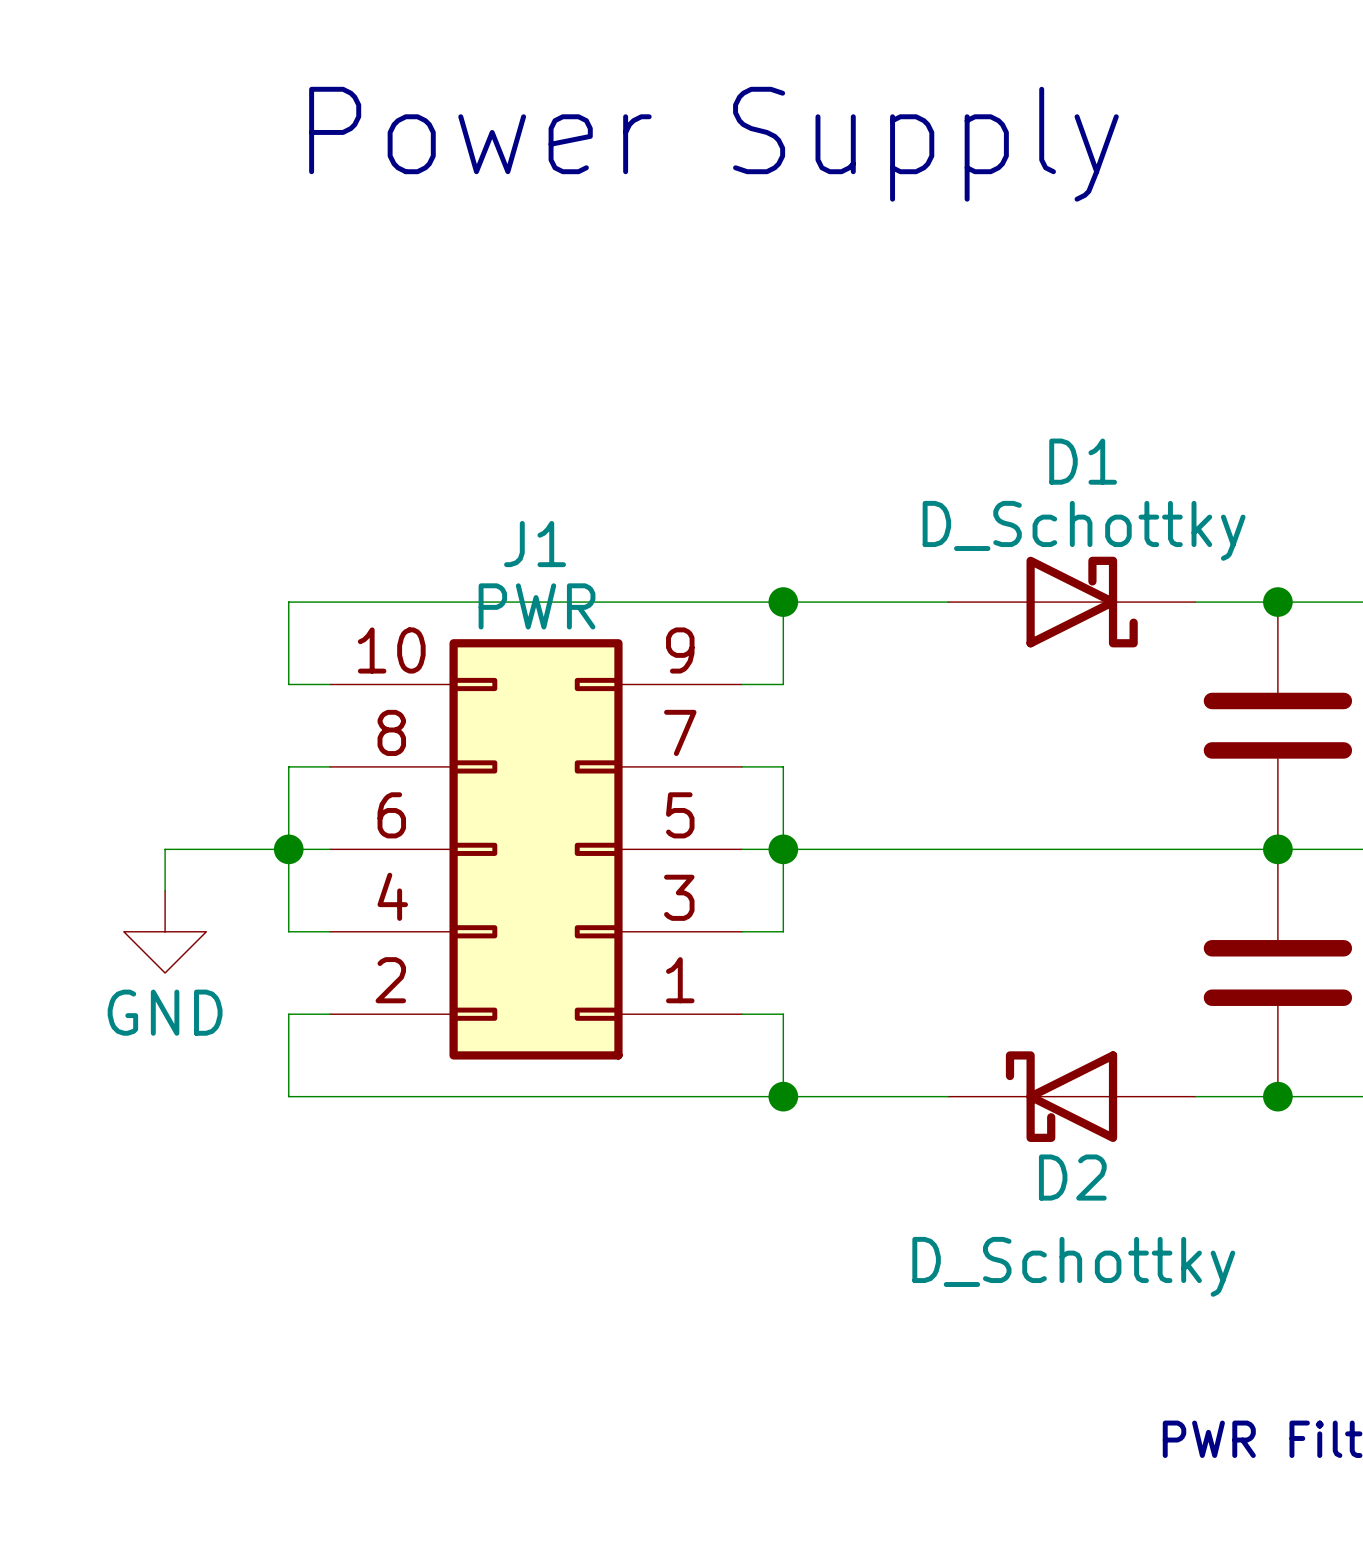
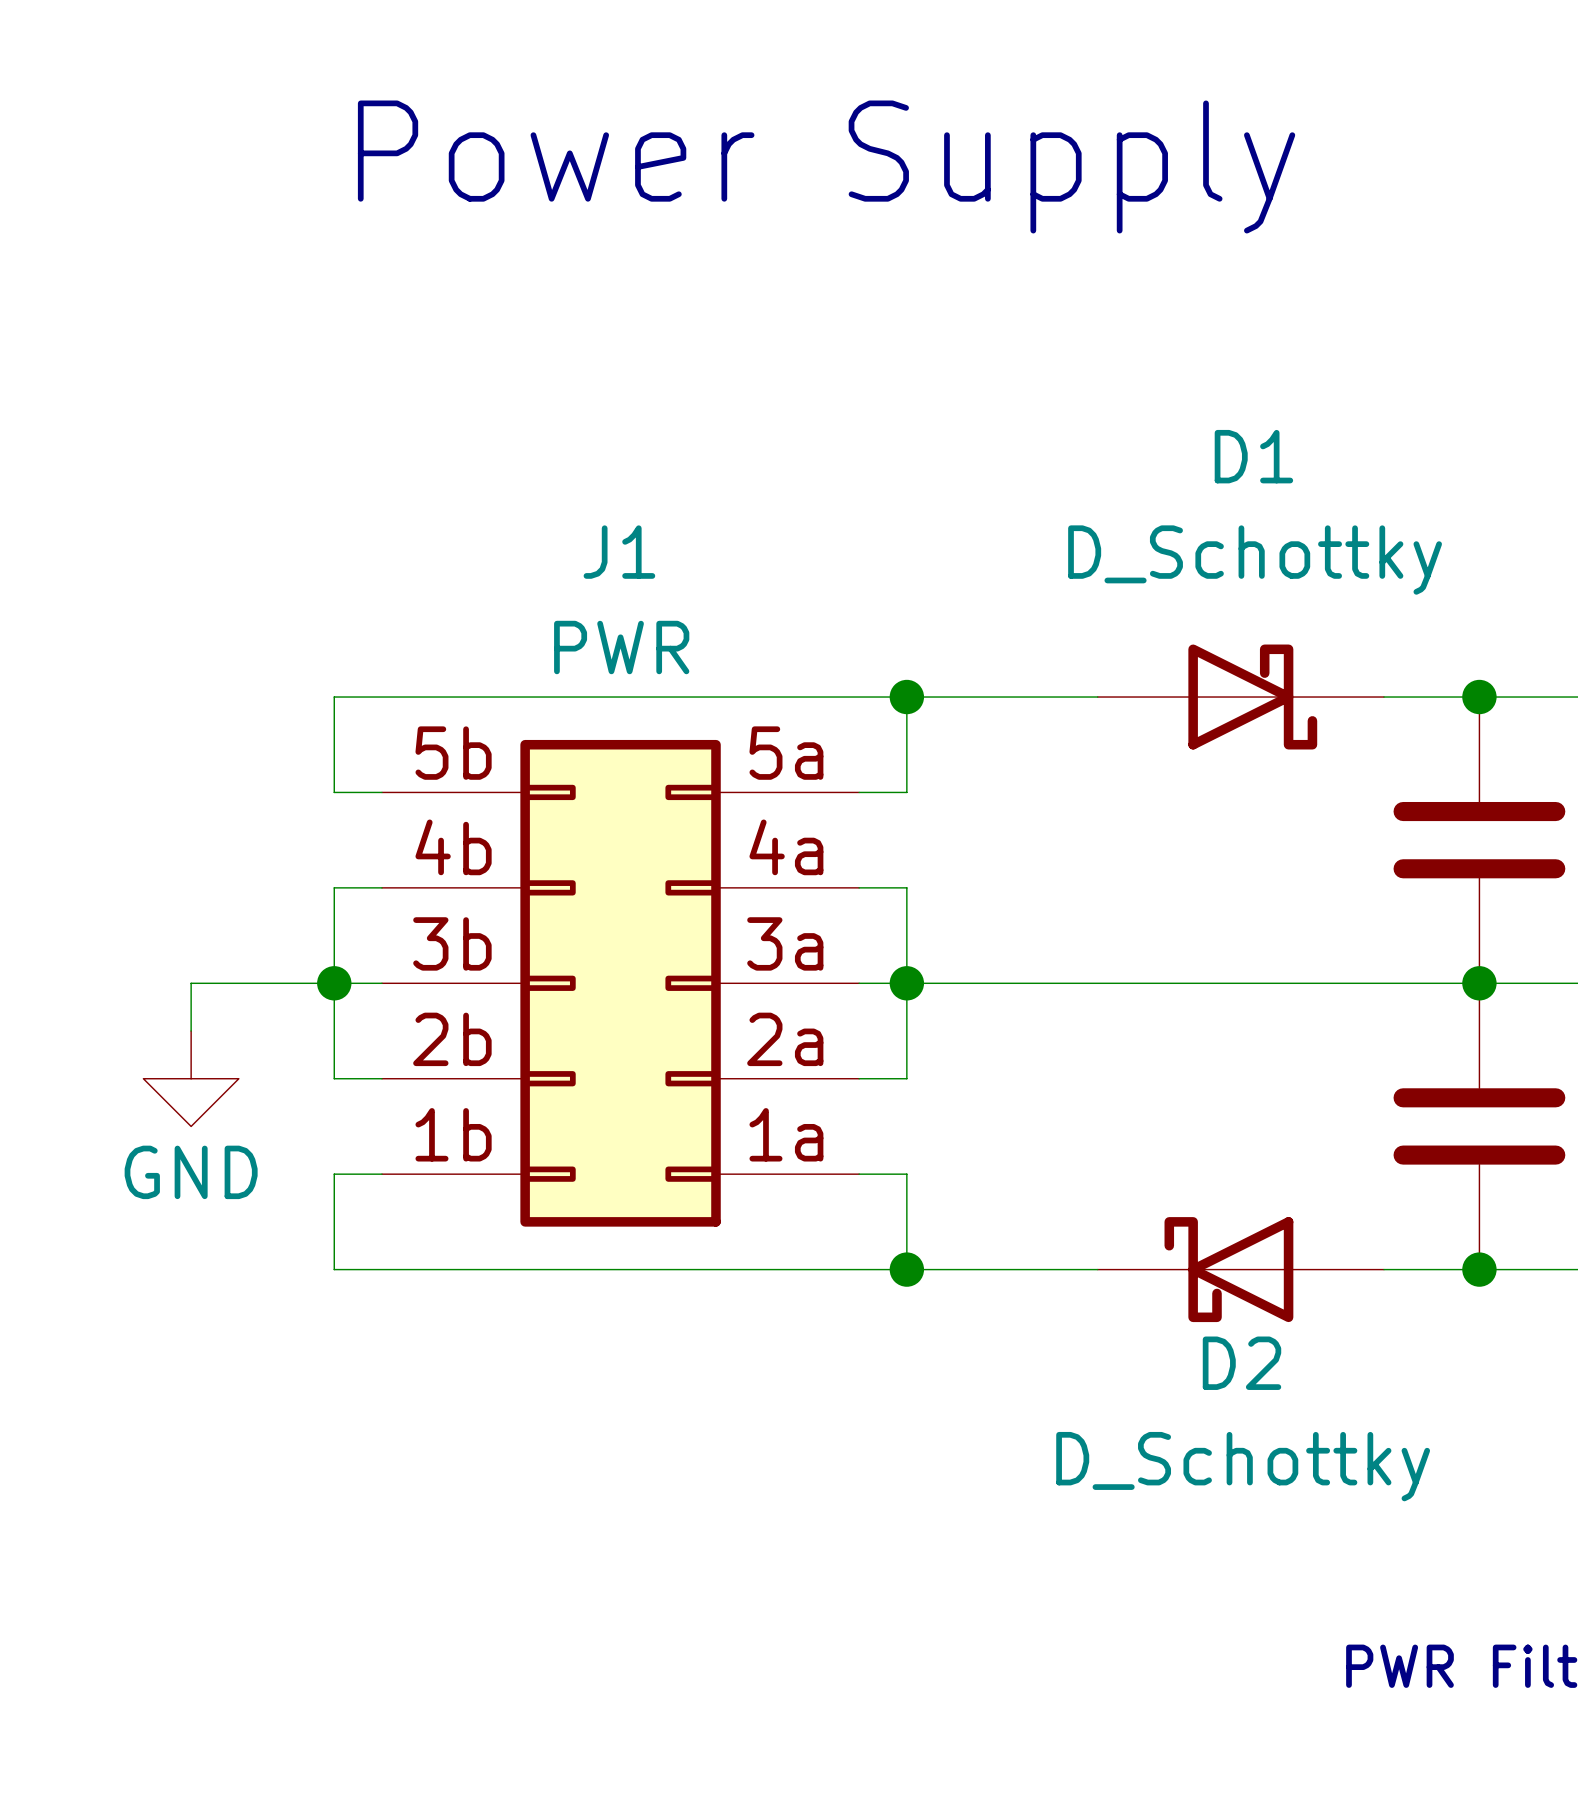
D1 name position: D1 (1083, 461) -> D1 (1253, 456)
D1 value position: D_Schottky (1084, 530) -> D_Schottky (1255, 560)
J1 name position: J1 (535, 544) -> J1 (619, 552)
J1 symbol: [329, 639, 743, 1060] -> [381, 739, 860, 1227]

